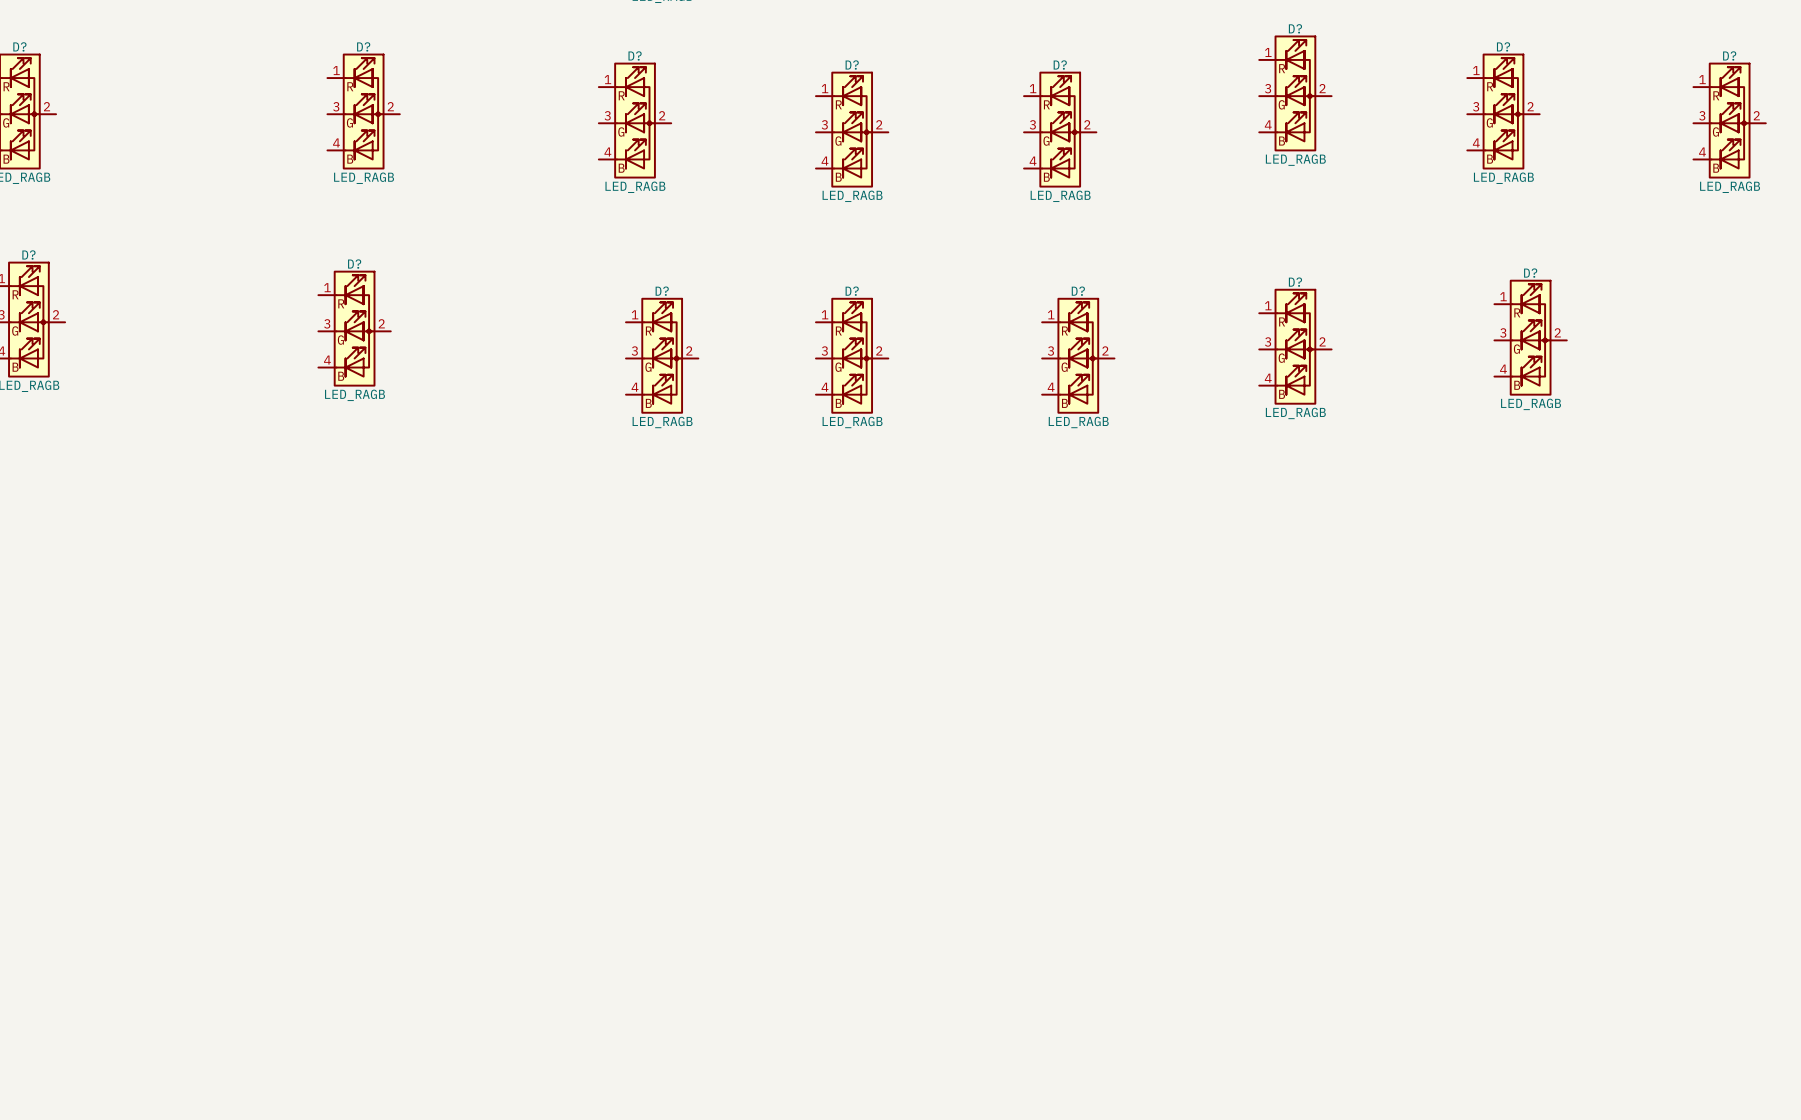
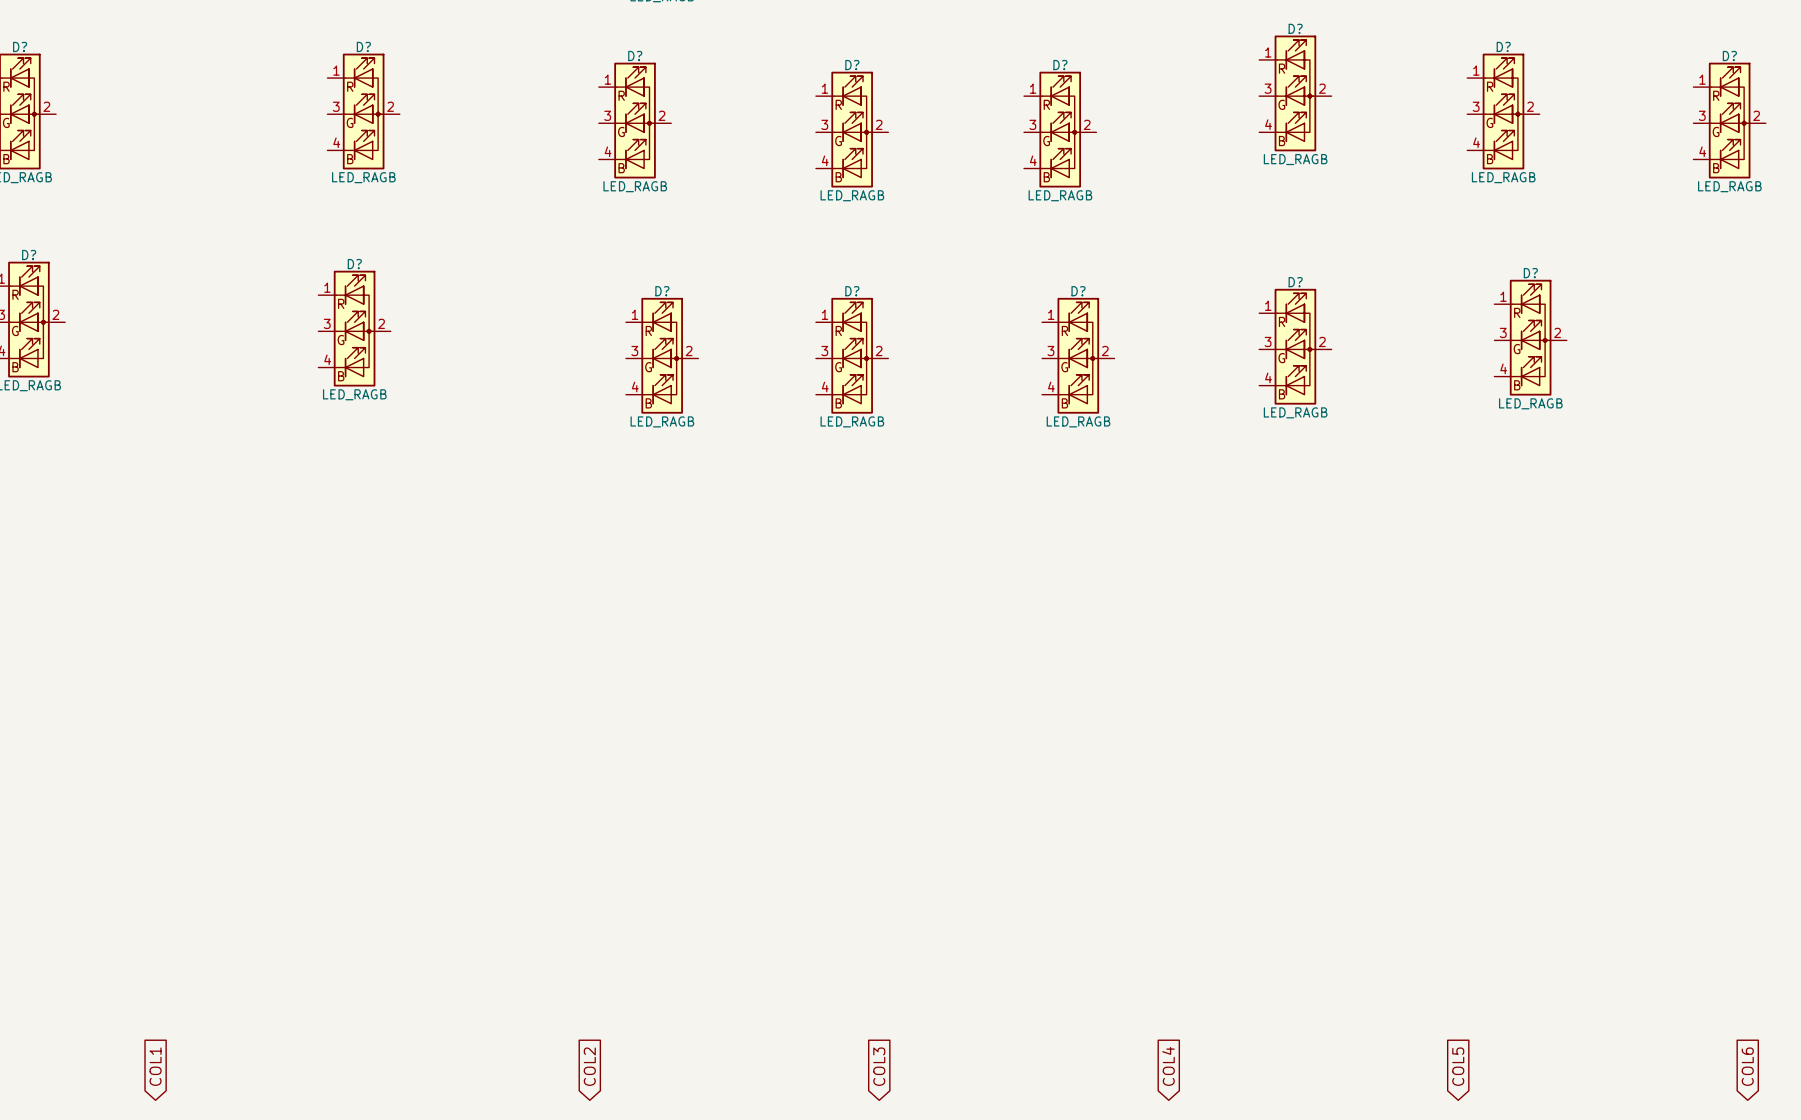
global label: none -> COL1 (155, 1066)
global label: none -> COL2 (589, 1066)
global label: none -> COL3 (879, 1066)
global label: none -> COL4 (1168, 1066)
global label: none -> COL5 (1458, 1066)
global label: none -> COL6 (1747, 1066)

